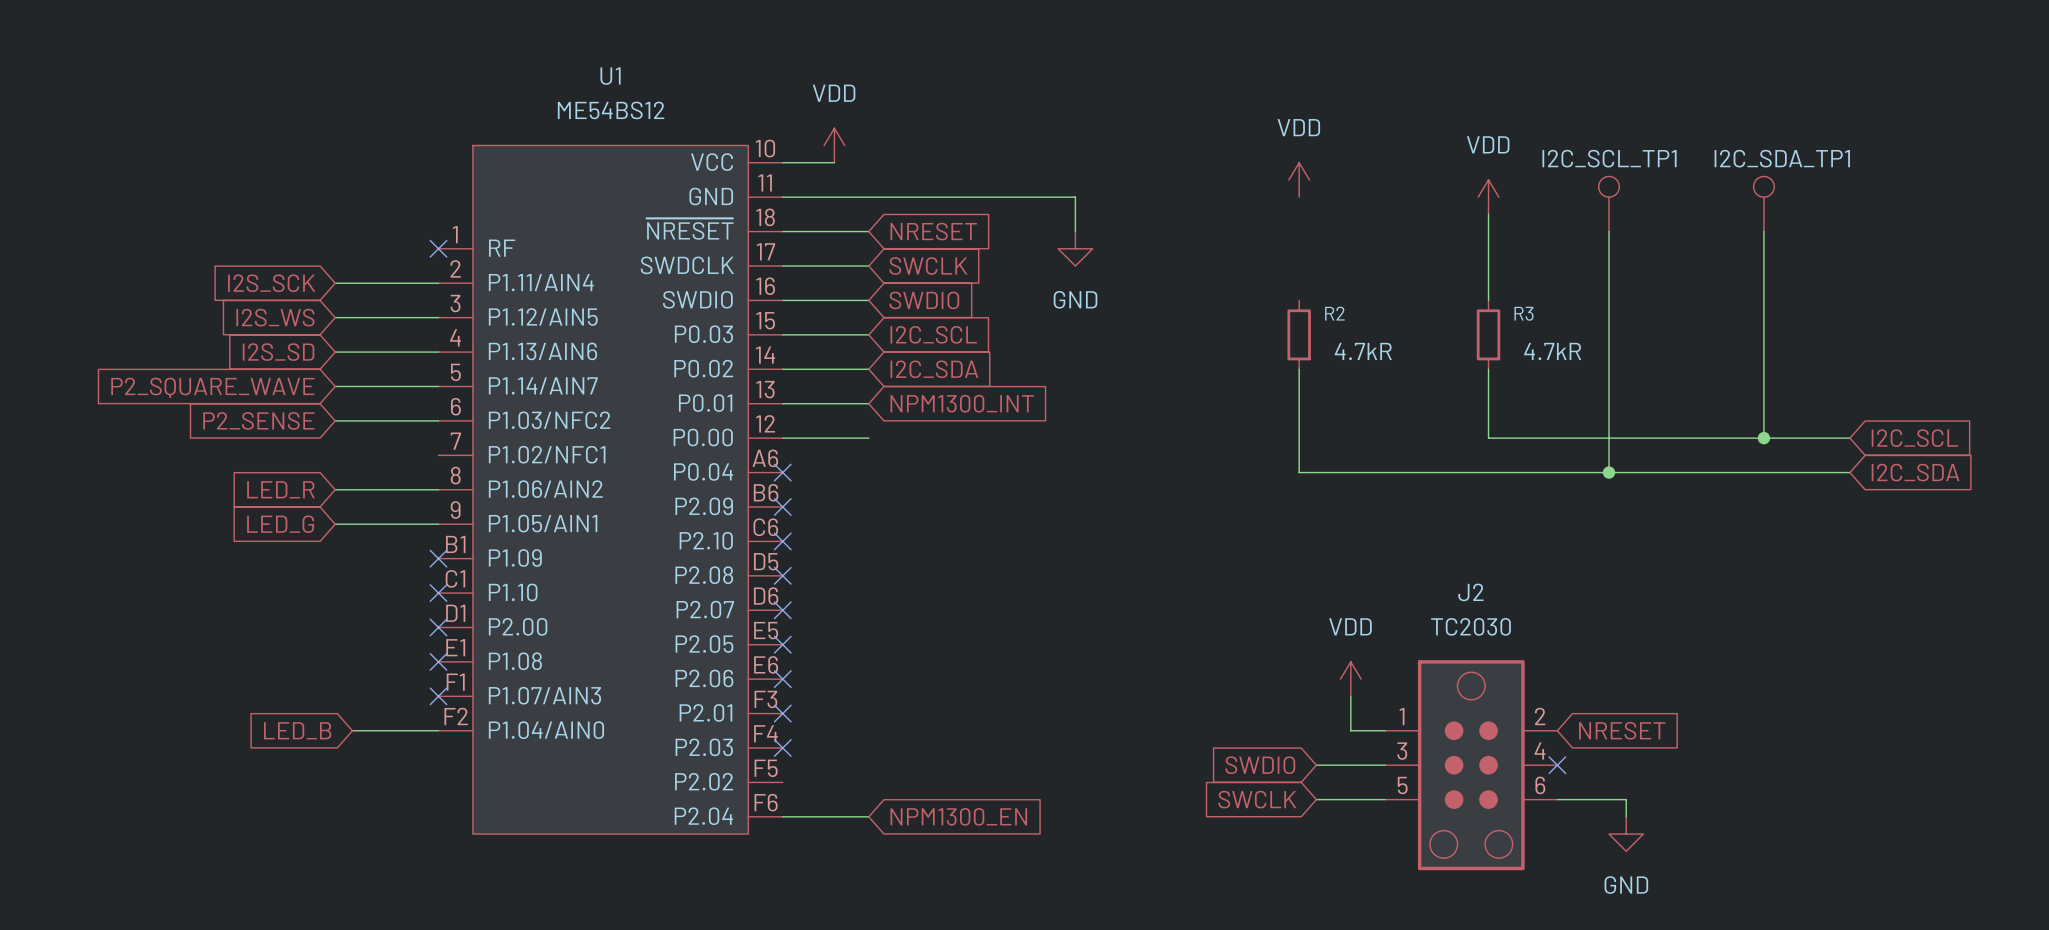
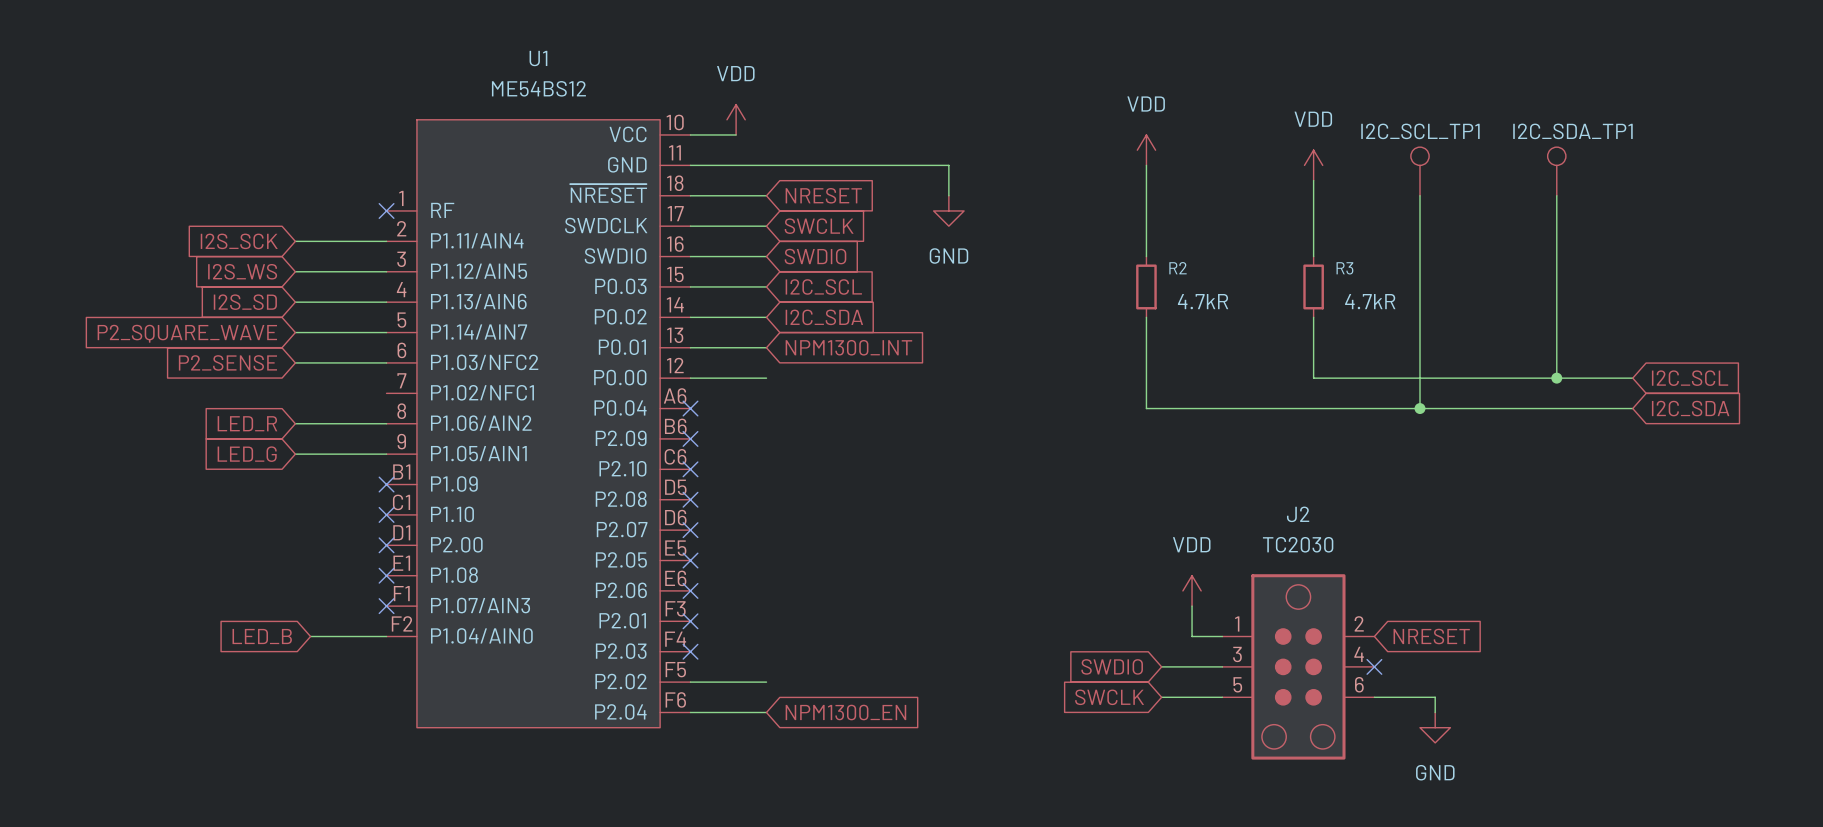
wire: none -> (1146, 165) (1146, 256)
wire: none -> (690, 682) (766, 682)

